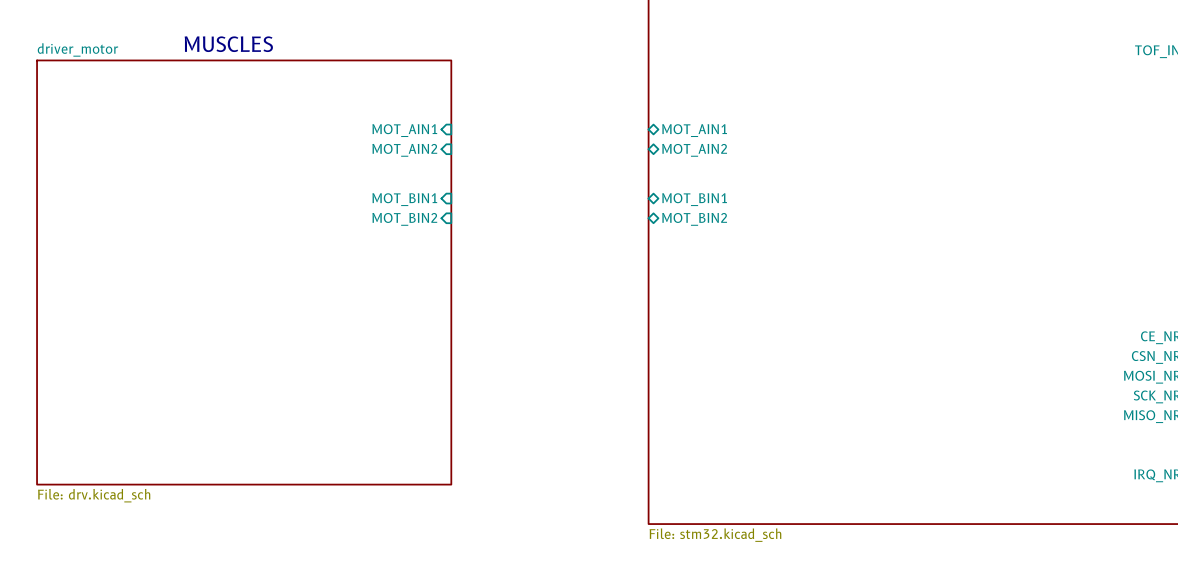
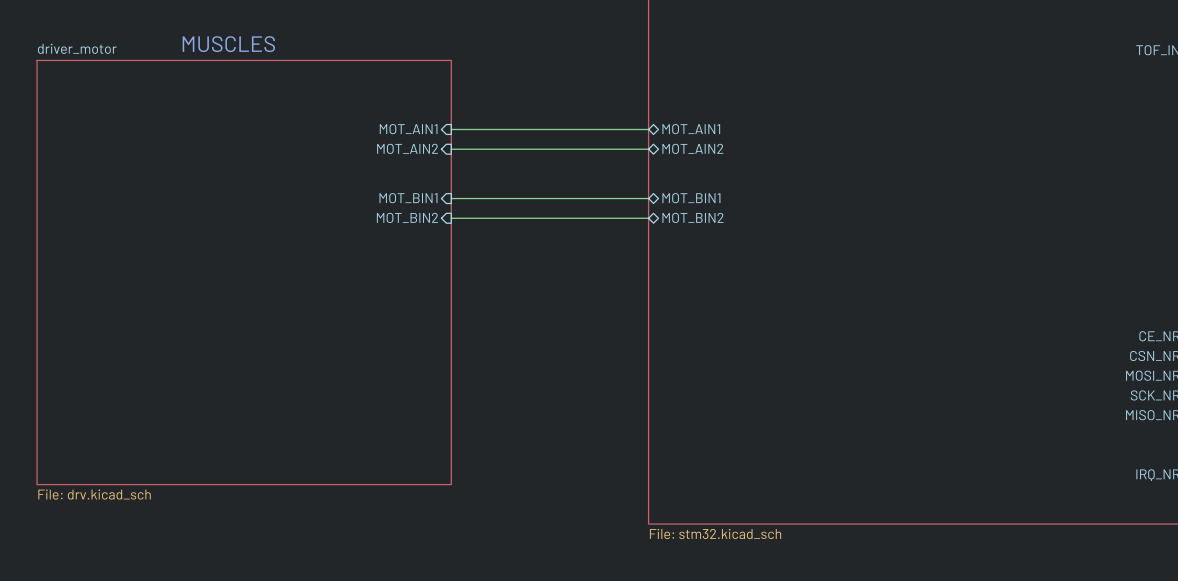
wire: none -> (451, 129) (648, 129)
wire: none -> (451, 149) (648, 149)
wire: none -> (451, 198) (648, 198)
wire: none -> (451, 218) (648, 218)

